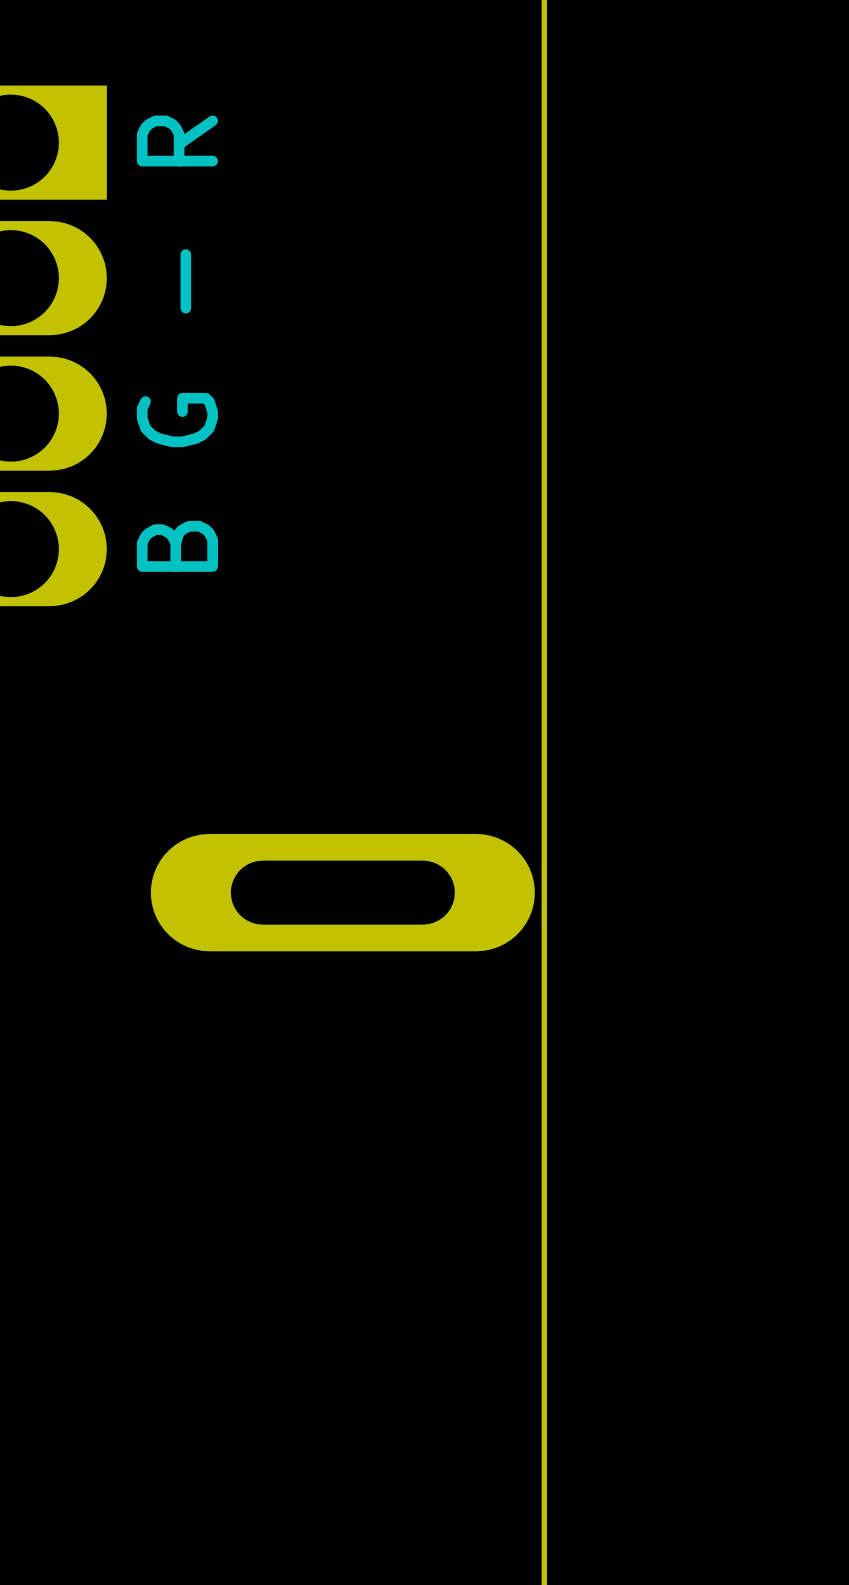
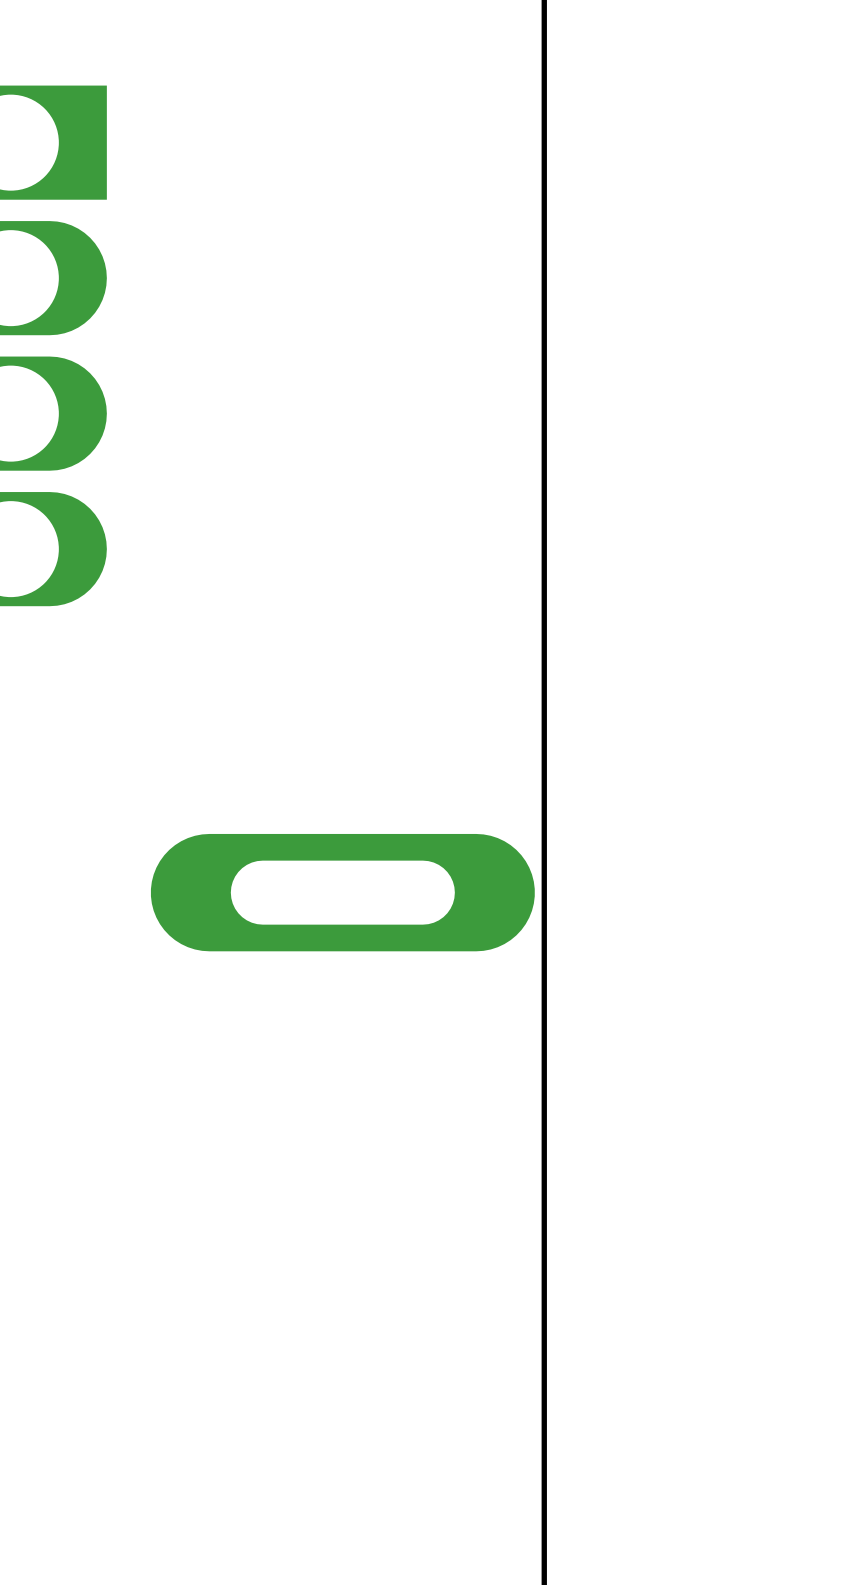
text: R (177, 140) -> none
text: - (185, 281) -> none
text: G (177, 420) -> none
text: B (177, 546) -> none

